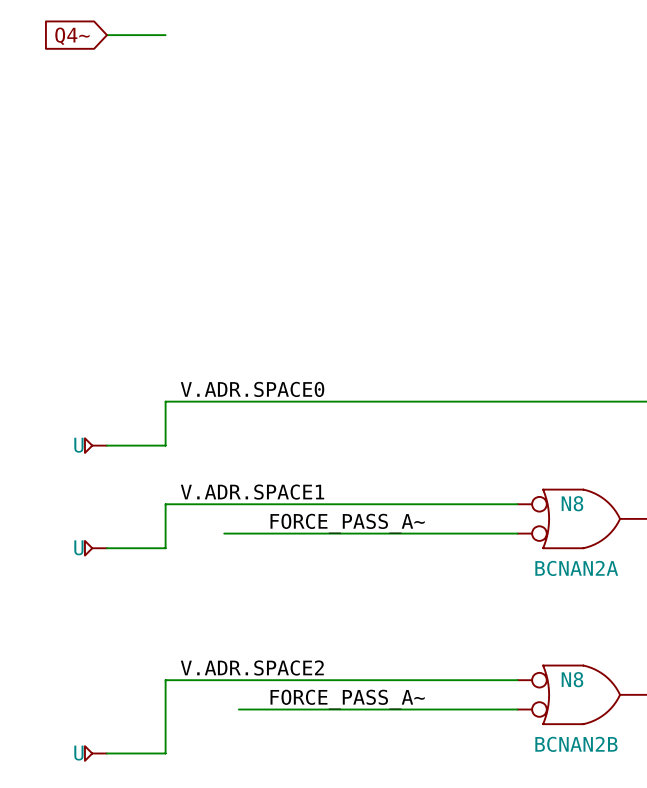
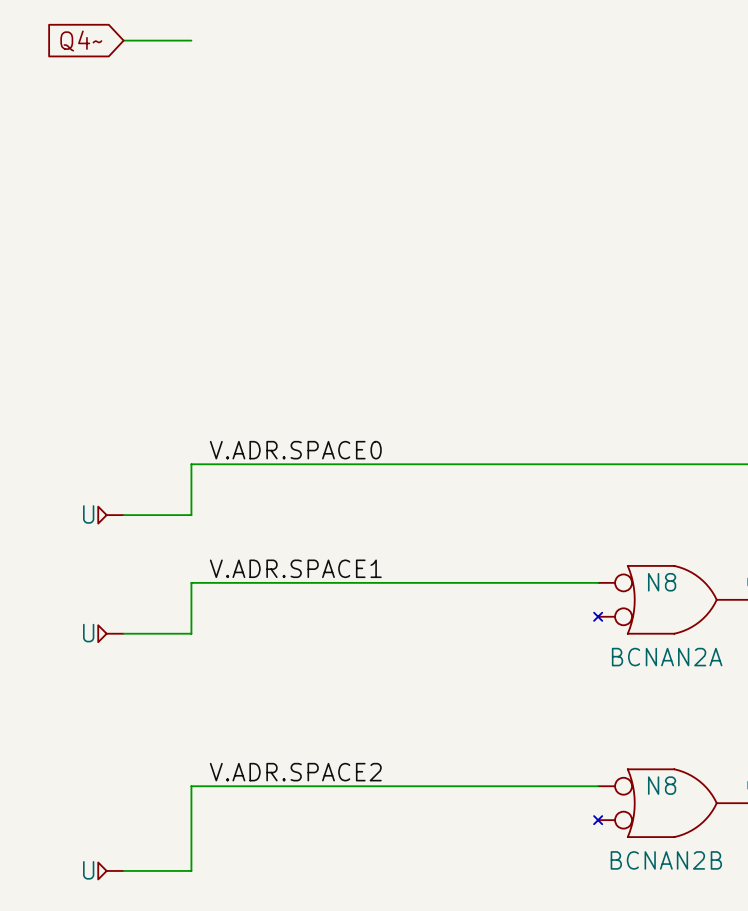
label: FORCE_PASS_A~ (347, 523) -> none
wire: (224, 533) (517, 533) -> none
no-connect mark: none -> (598, 616)
label: FORCE_PASS_A~ (347, 699) -> none
wire: (238, 709) (517, 709) -> none
no-connect mark: none -> (598, 820)

